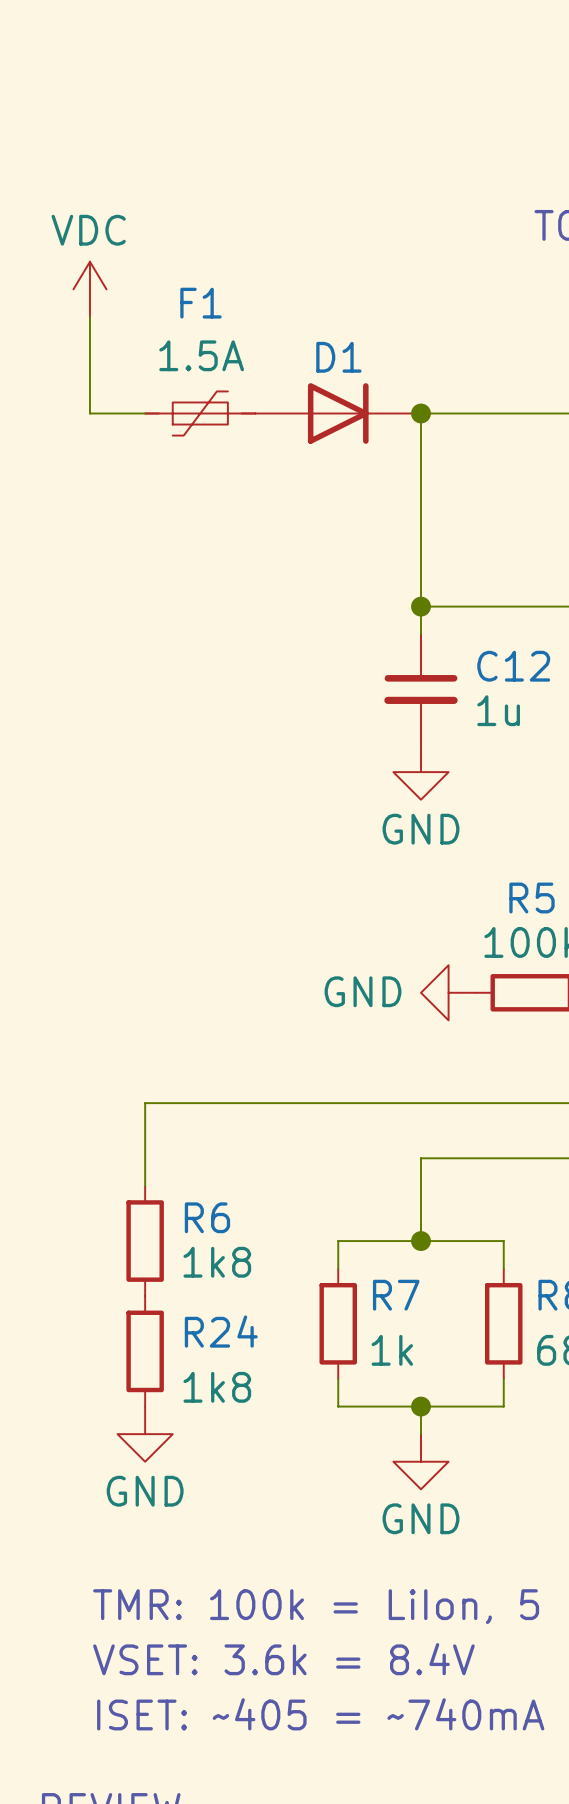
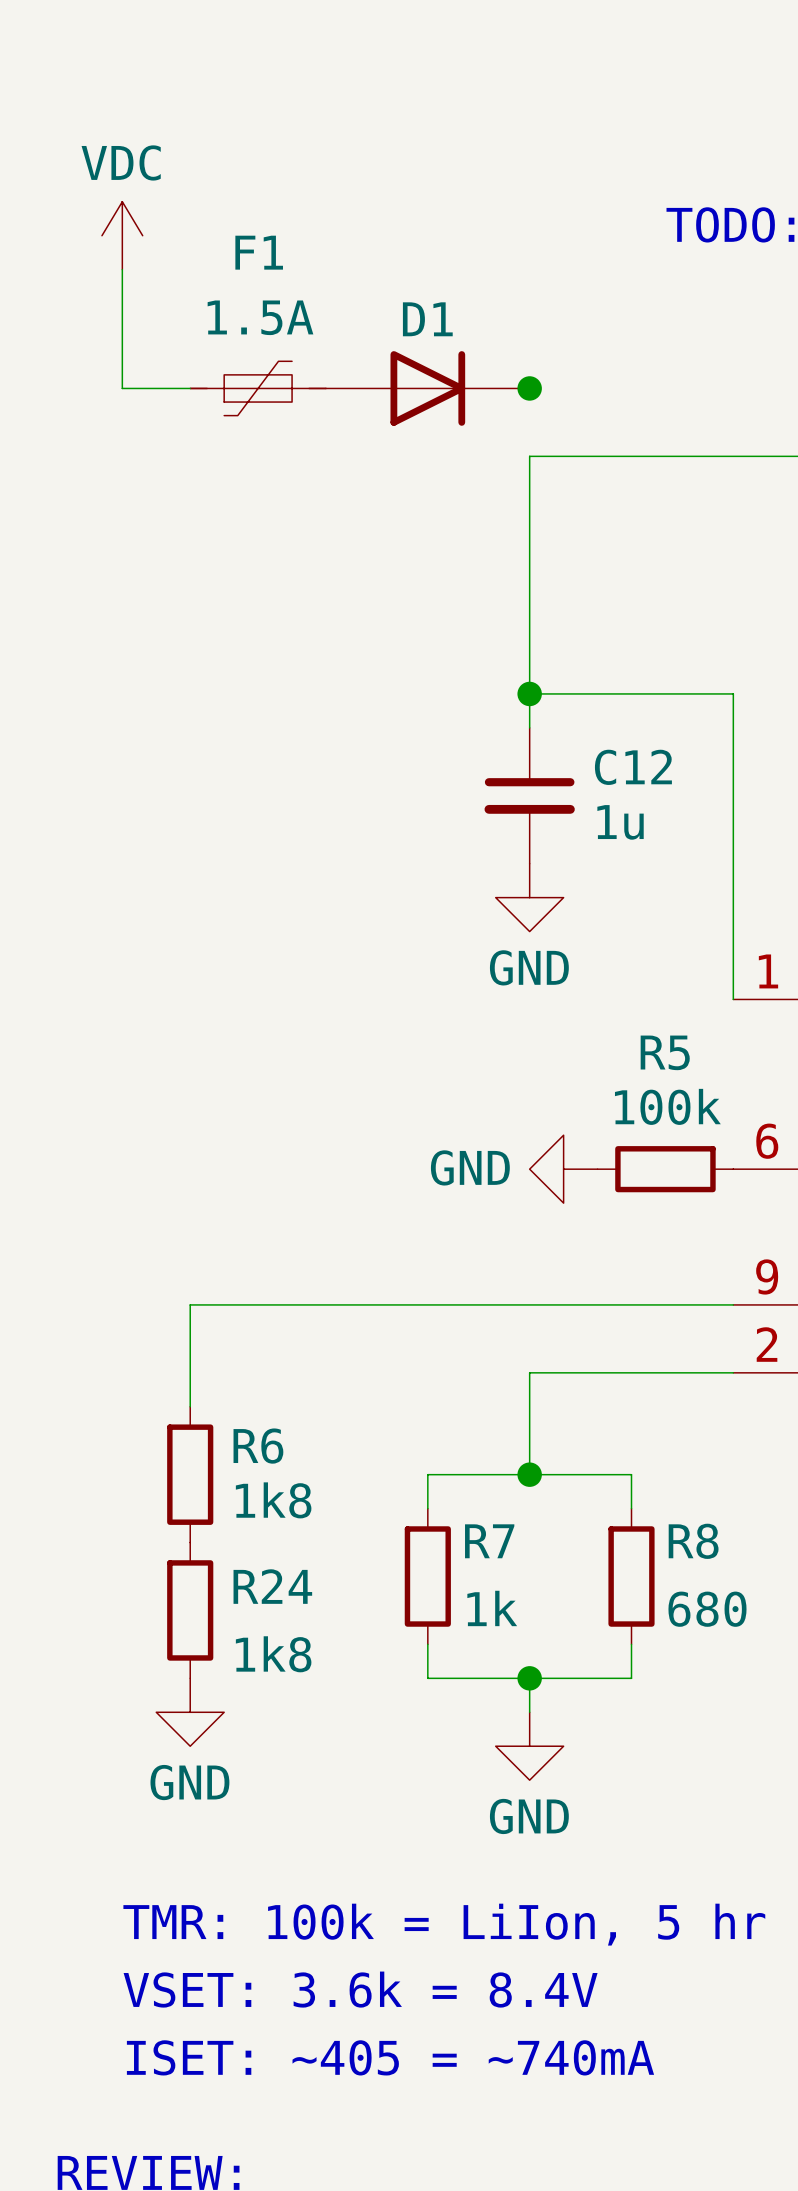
power symbol position: VDC (89, 289) -> VDC (122, 235)
wire: (89, 358) (89, 413) (145, 413) -> (122, 388) (190, 388)
F1 position: (200, 413) -> (258, 388)
D1 position: (338, 413) -> (427, 388)
junction position: (421, 413) -> (529, 388)

